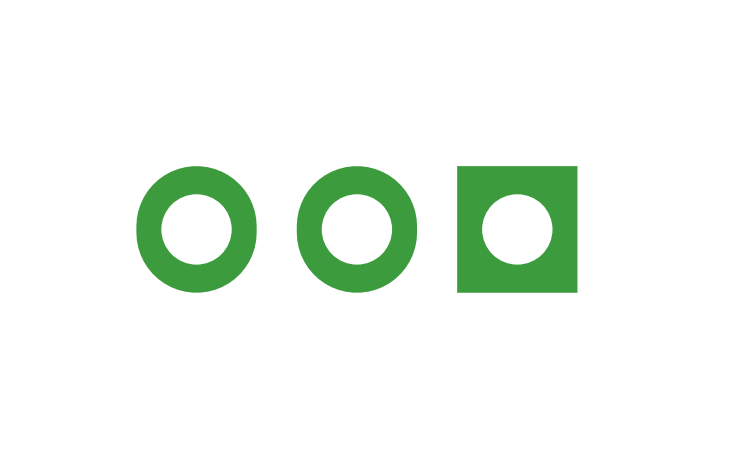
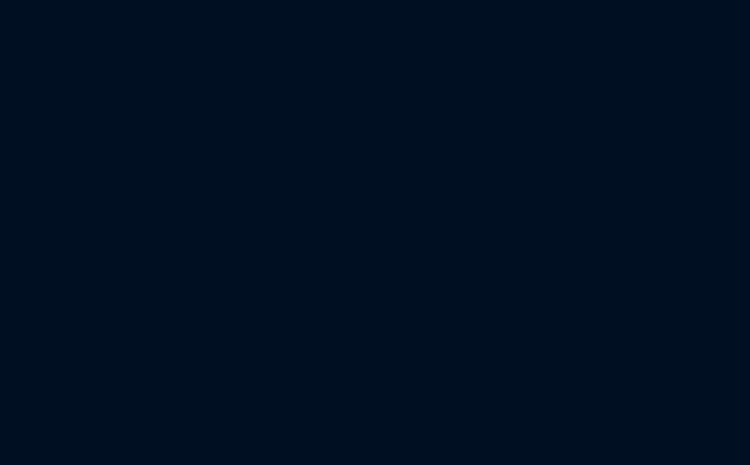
part: (356, 229) -> none

